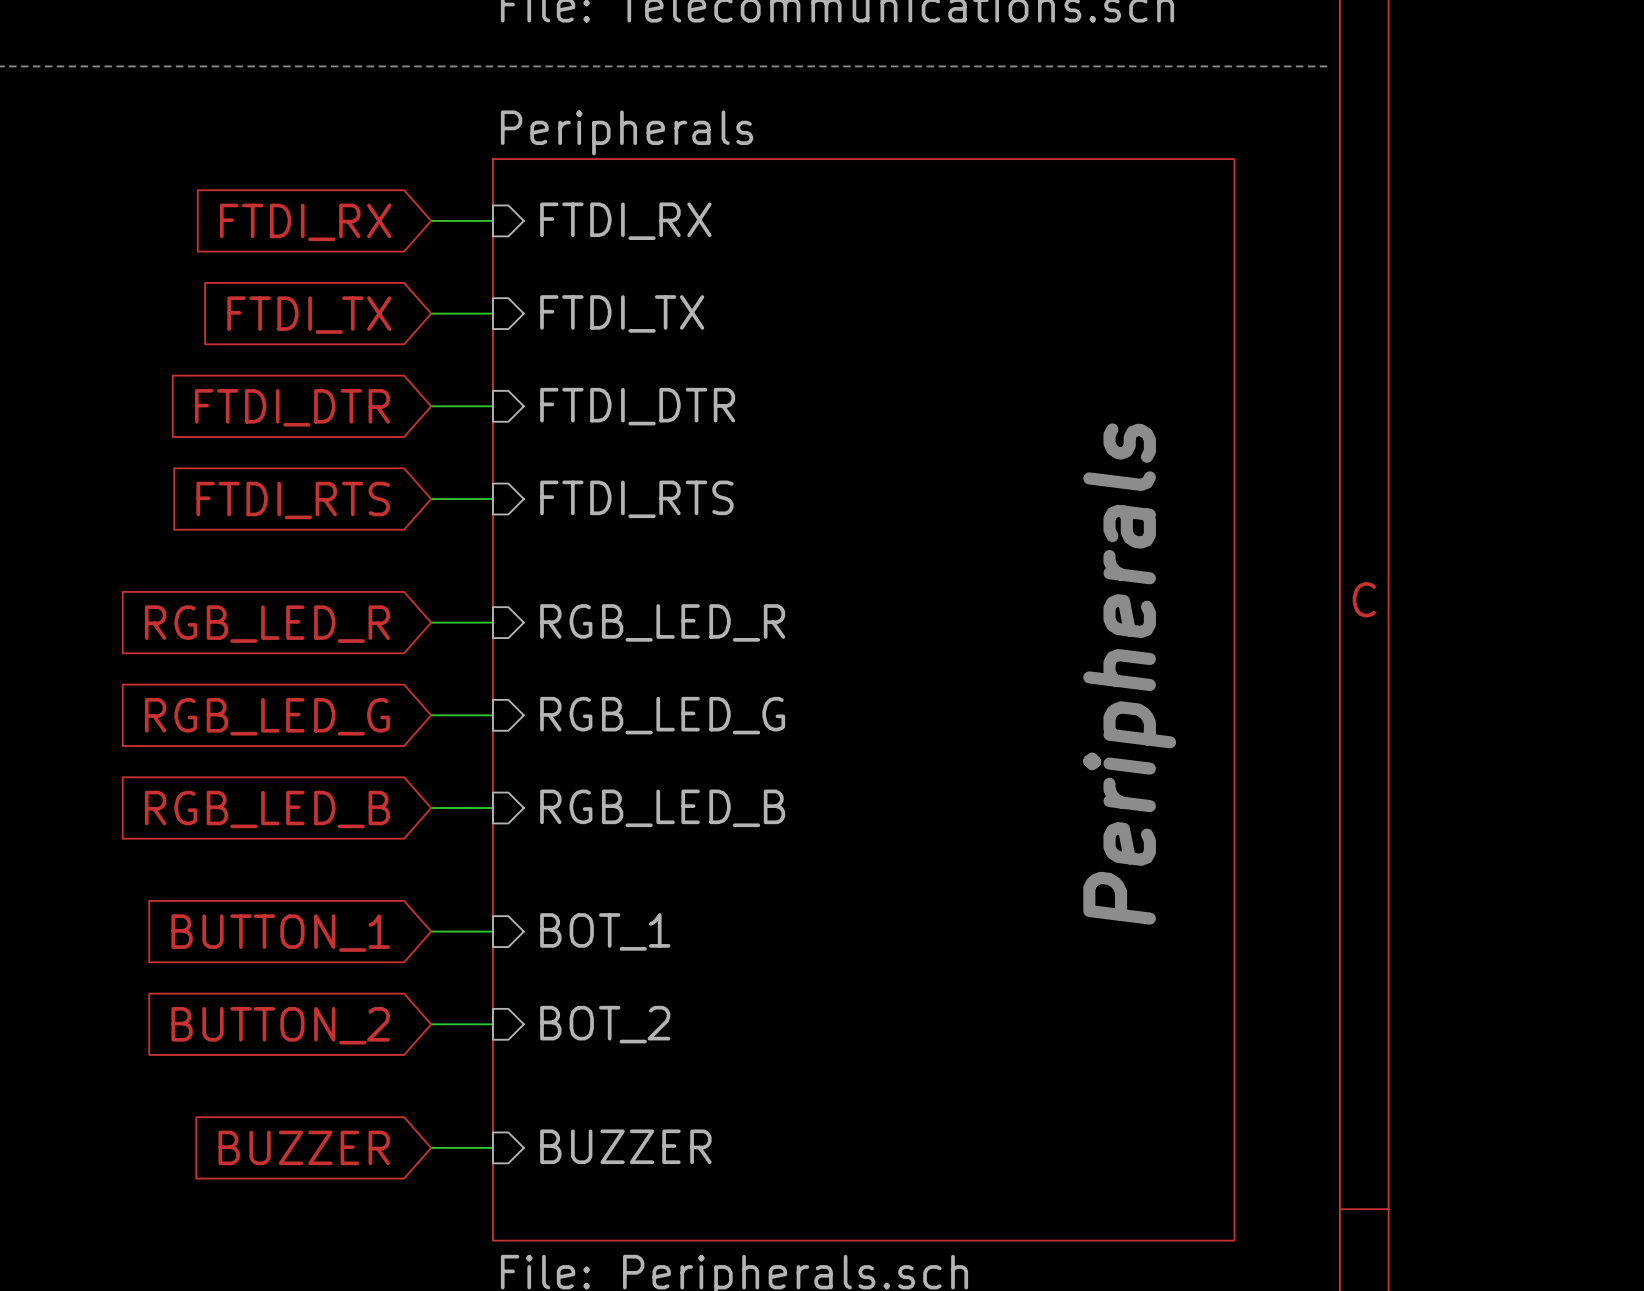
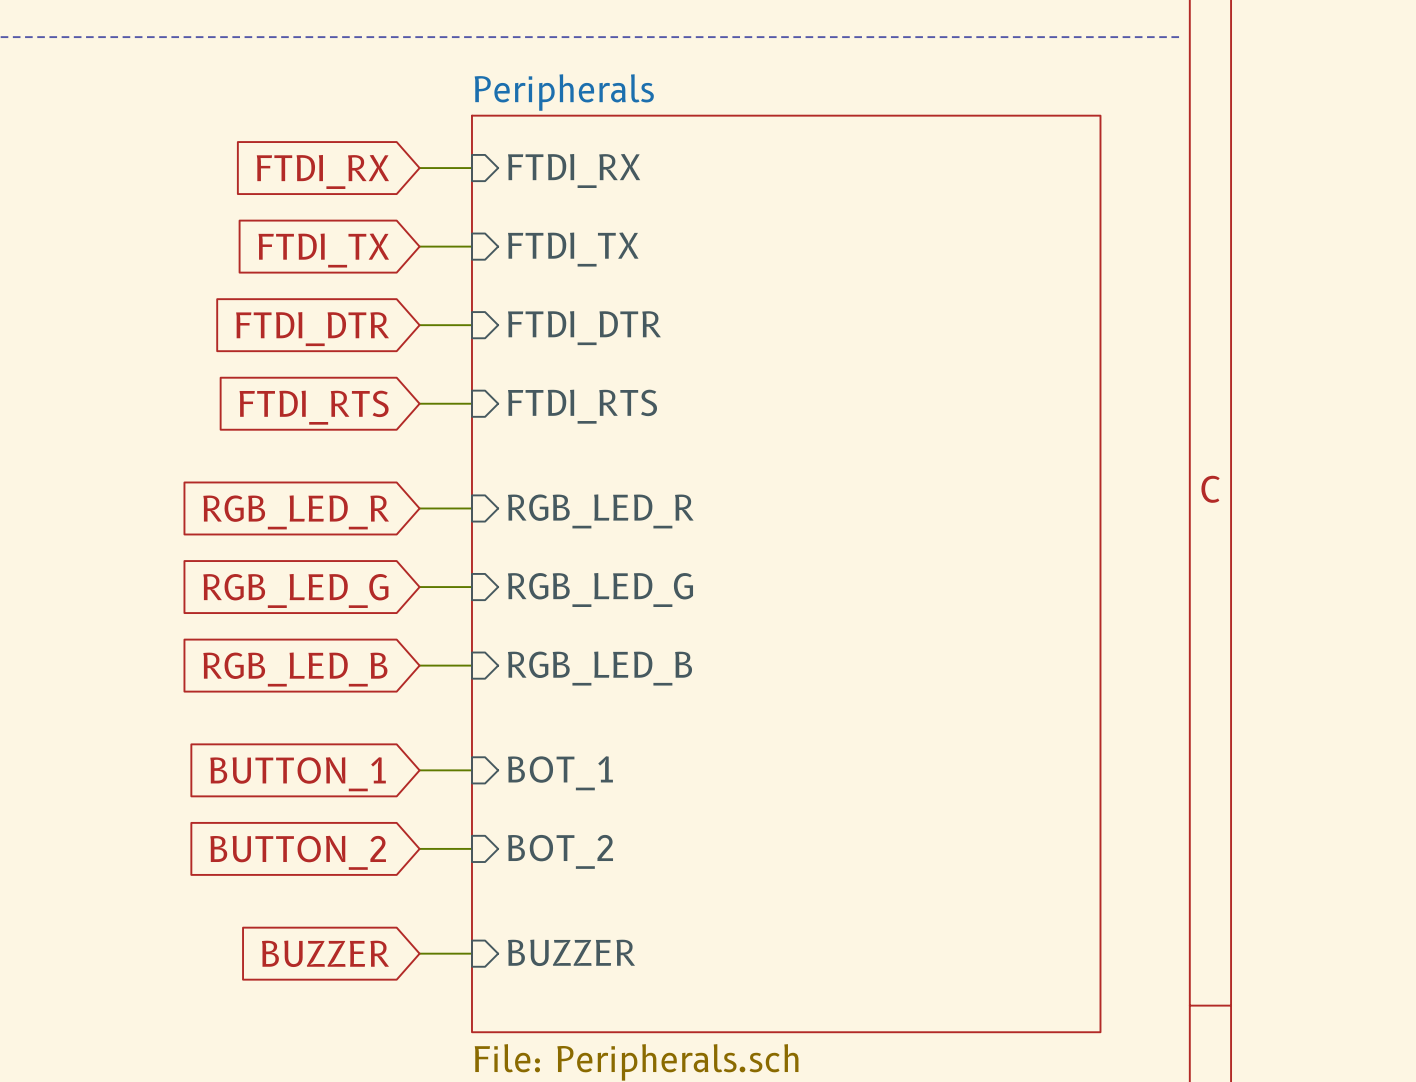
text: Peripherals (1129, 673) -> none

